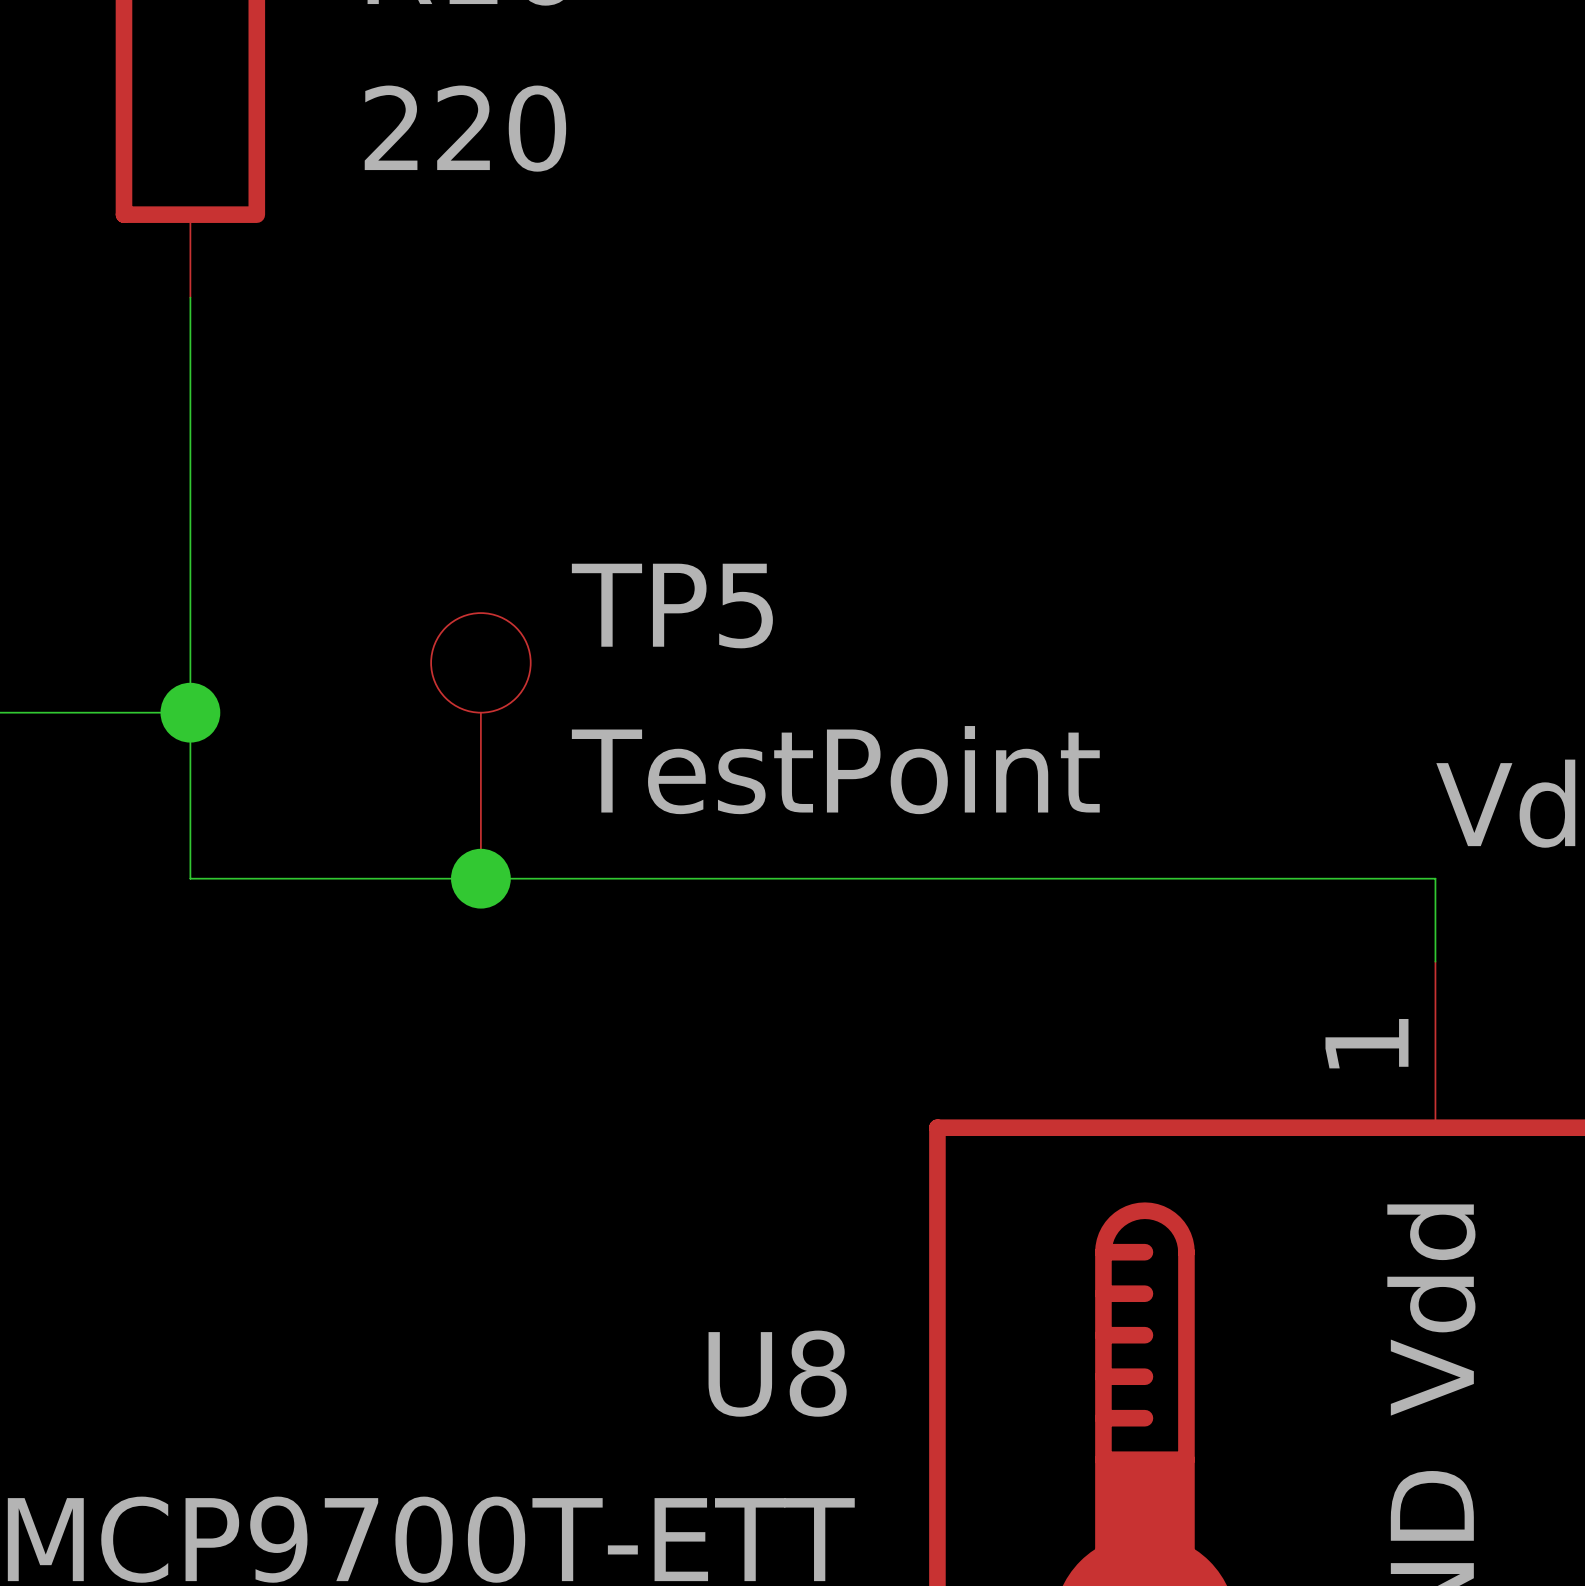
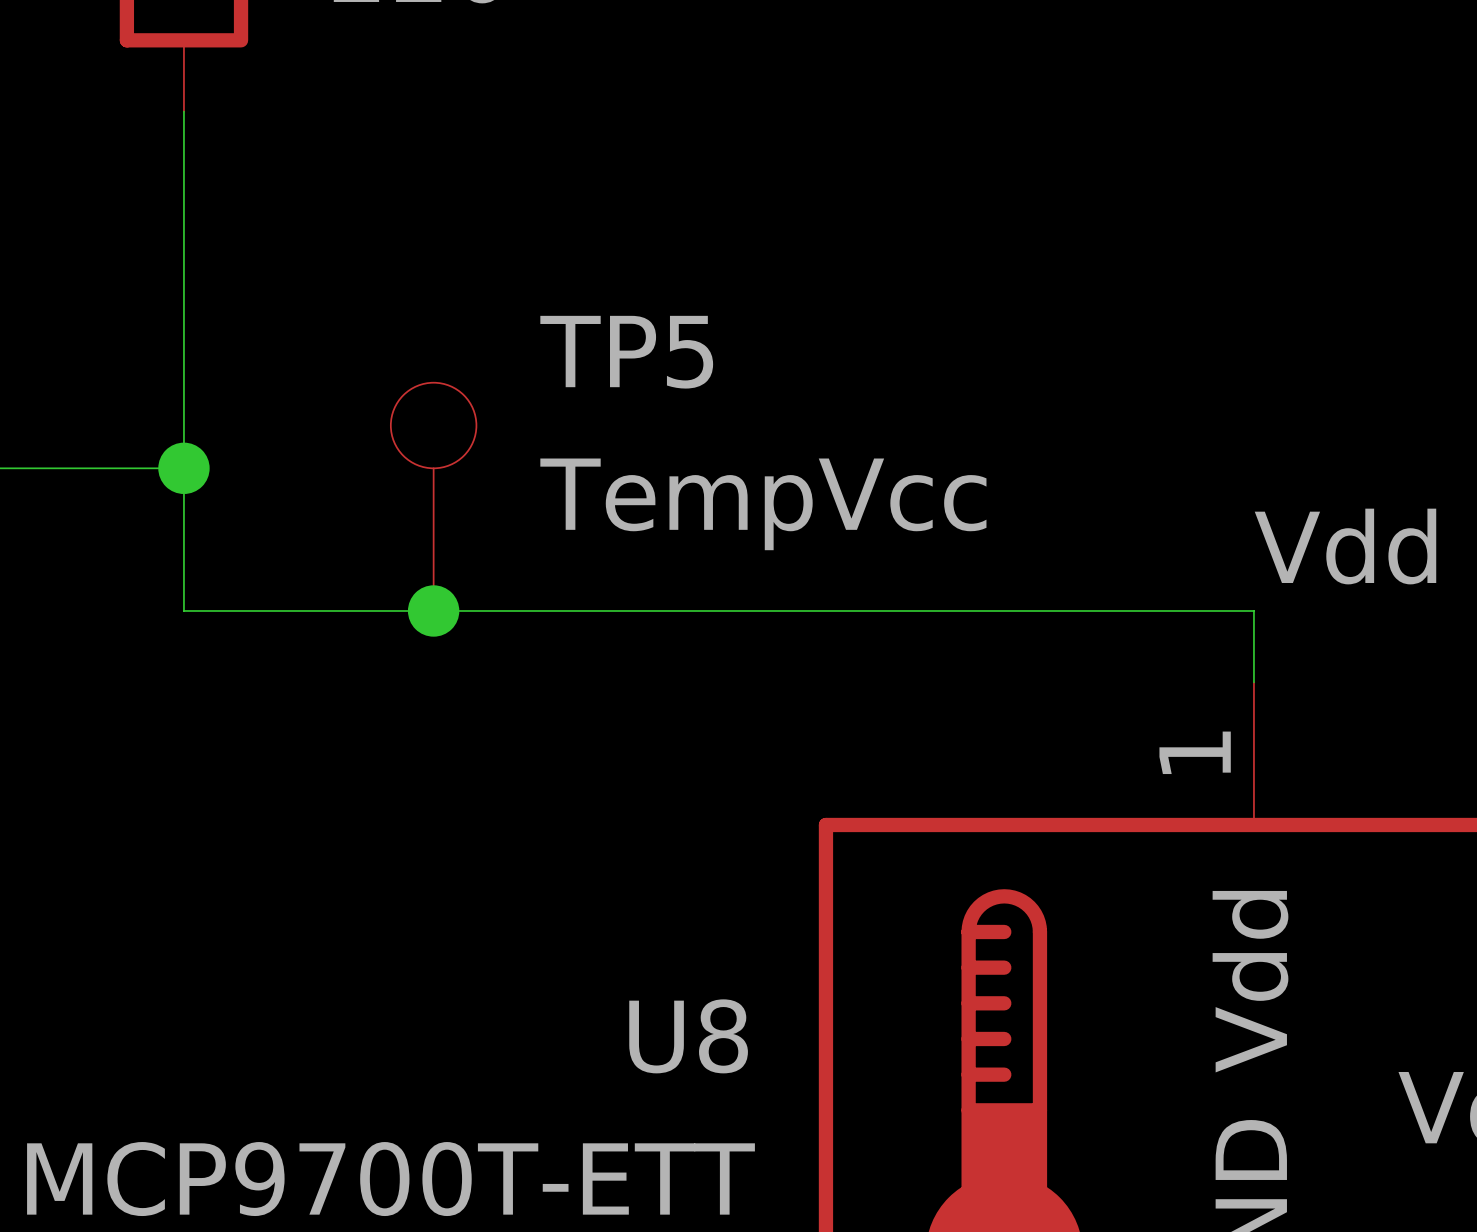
TP5 name position: TP5 (672, 606) -> TP5 (626, 352)
TP5 value: TestPoint (835, 770) -> TempVcc (763, 504)

